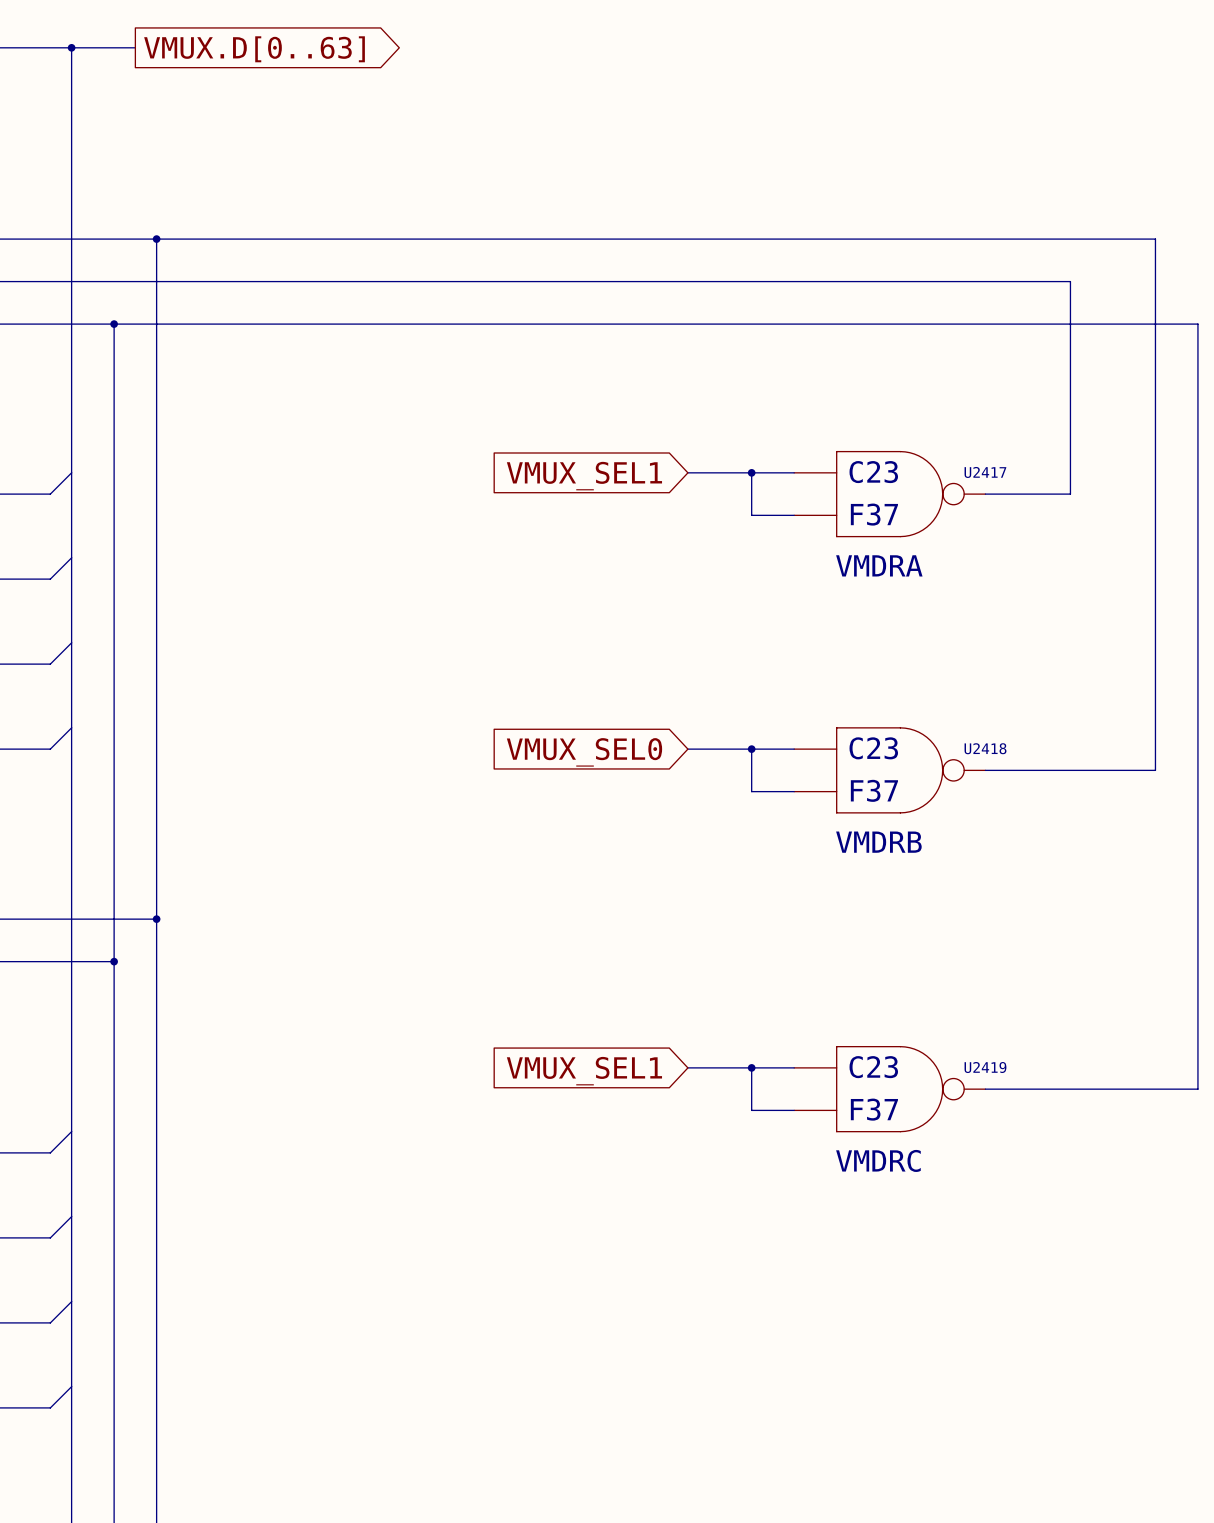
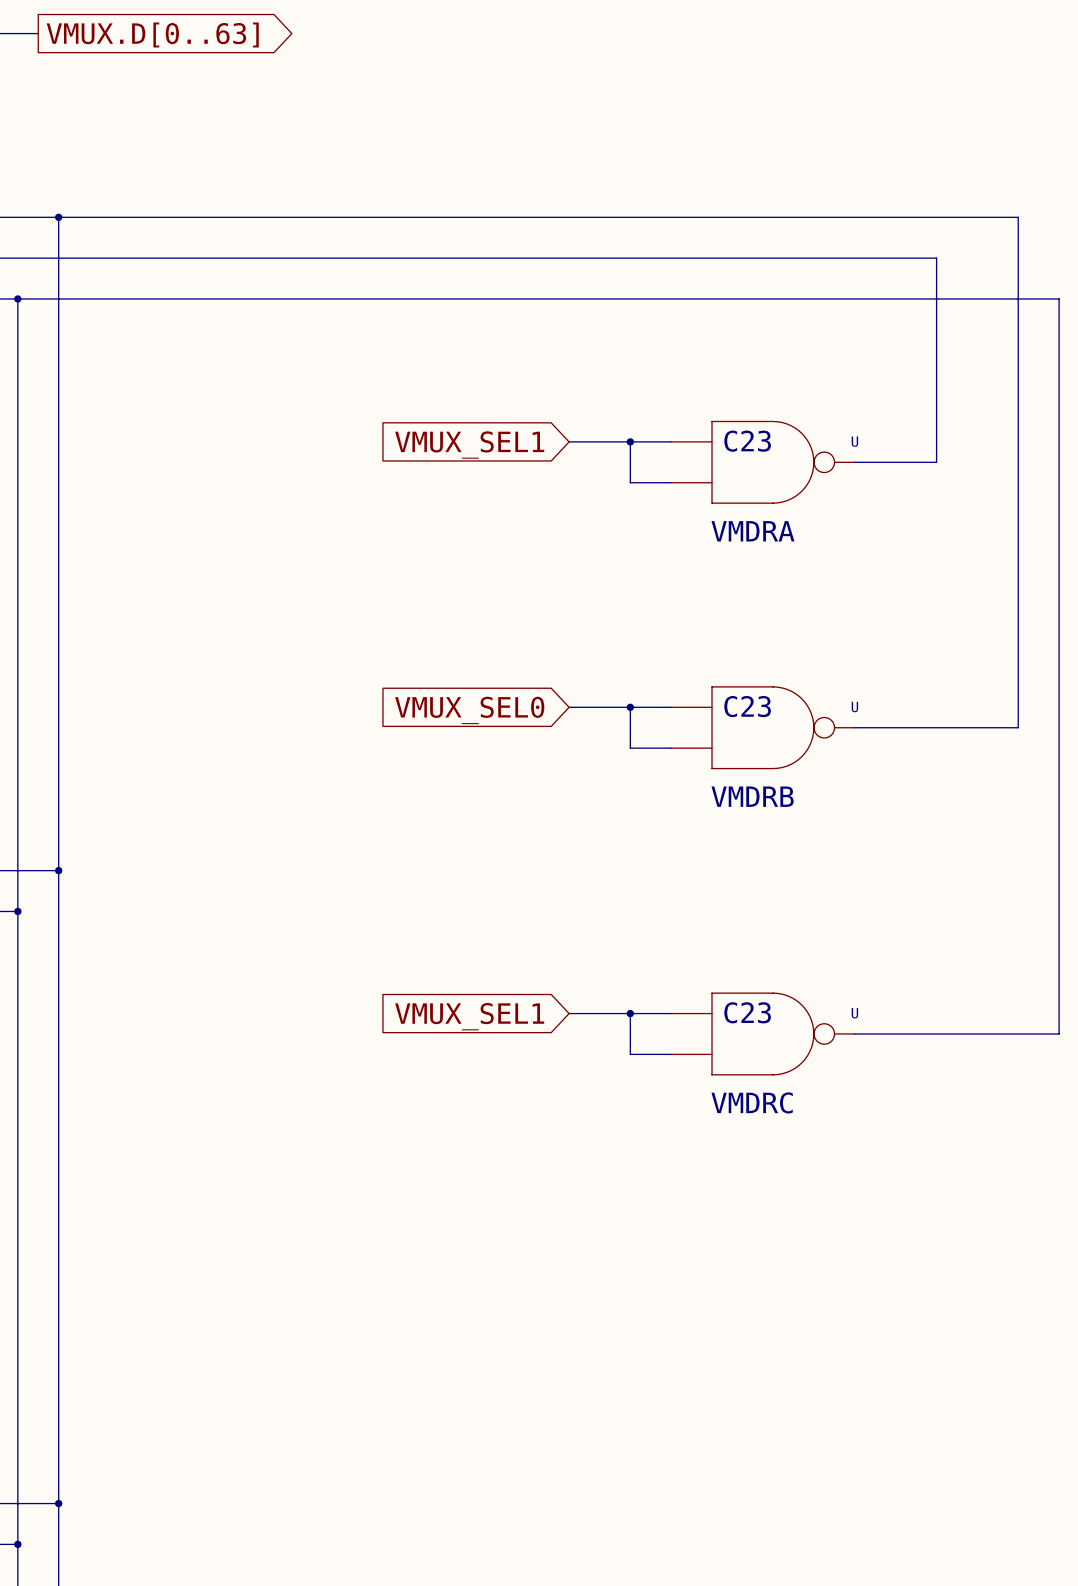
U2417 name: U2417 (985, 472) -> U (854, 441)
U2417 value: F37 (874, 514) -> none
U2418 name: U2418 (985, 748) -> U (854, 707)
U2418 value: F37 (874, 790) -> none
U2419 name: U2419 (985, 1067) -> U (854, 1013)
U2419 value: F37 (874, 1109) -> none

